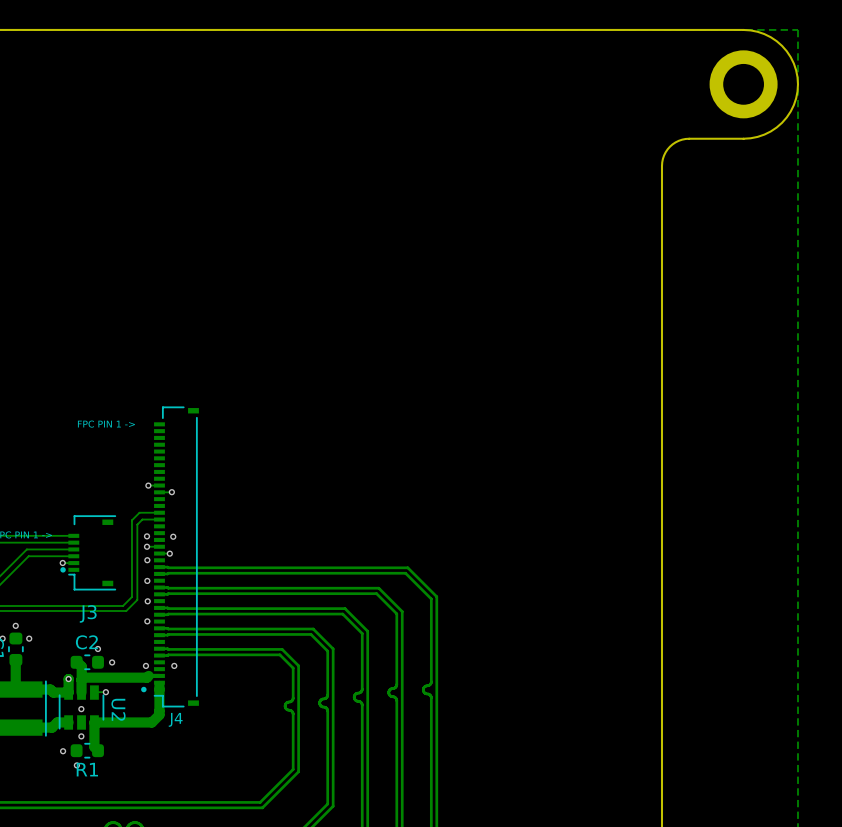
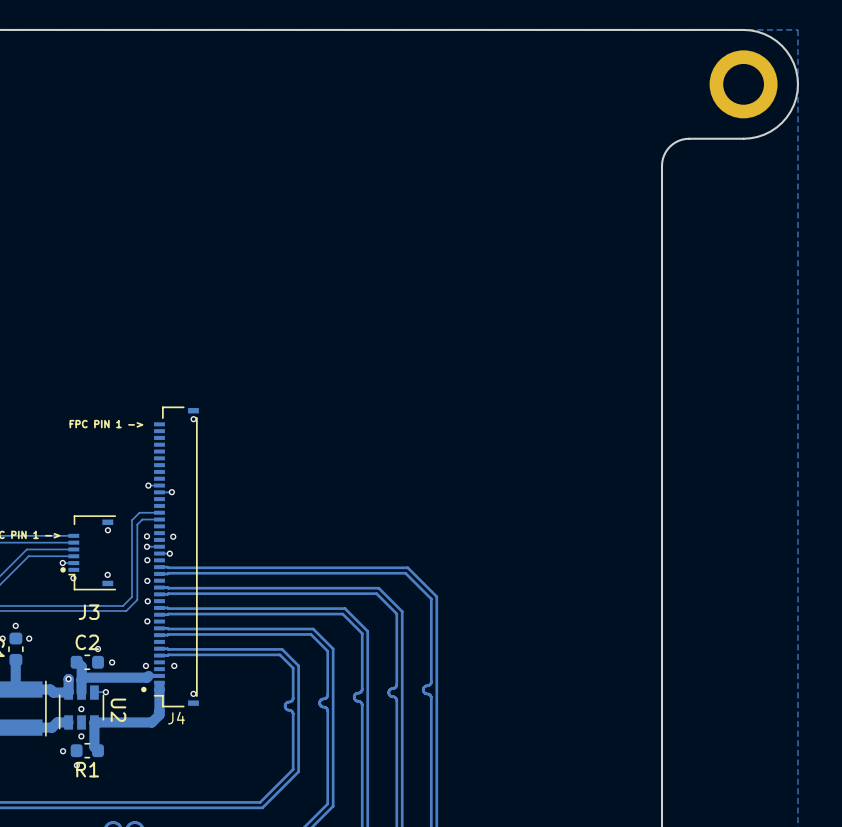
via: none -> (193, 419)
via: none -> (107, 530)
via: none -> (107, 574)
via: none -> (73, 578)
via: none -> (193, 693)

